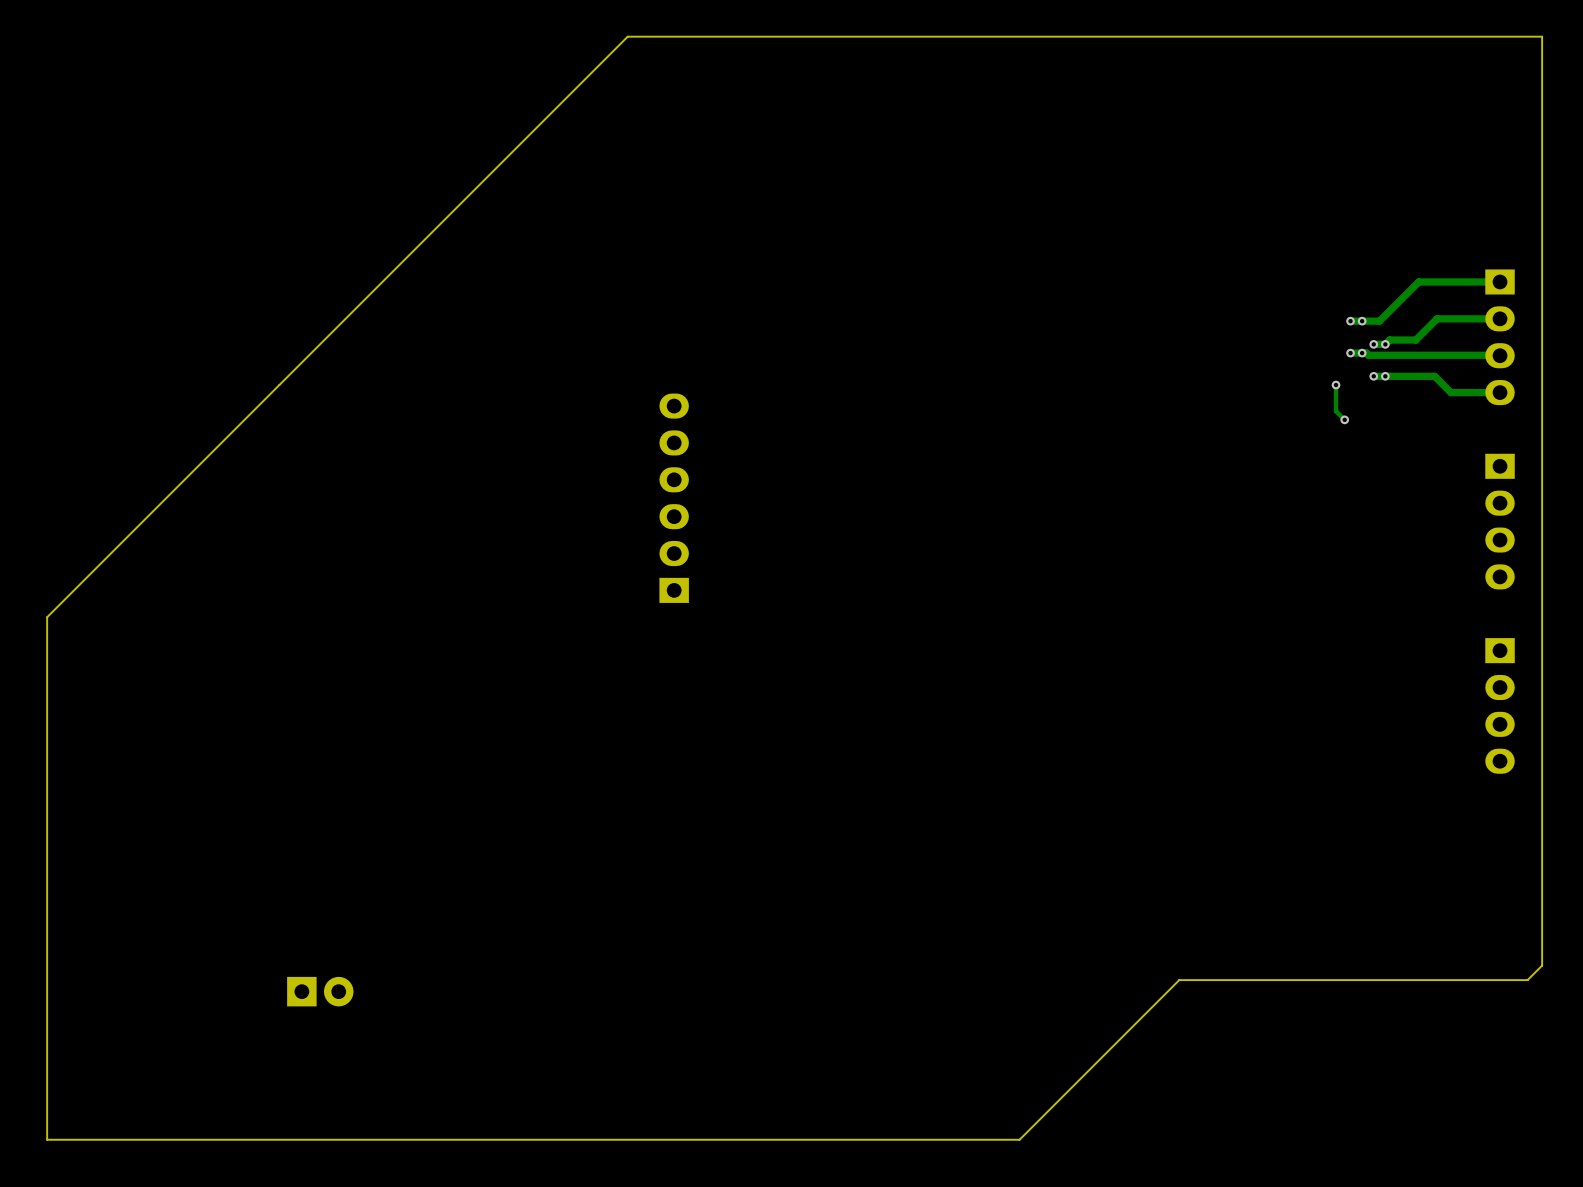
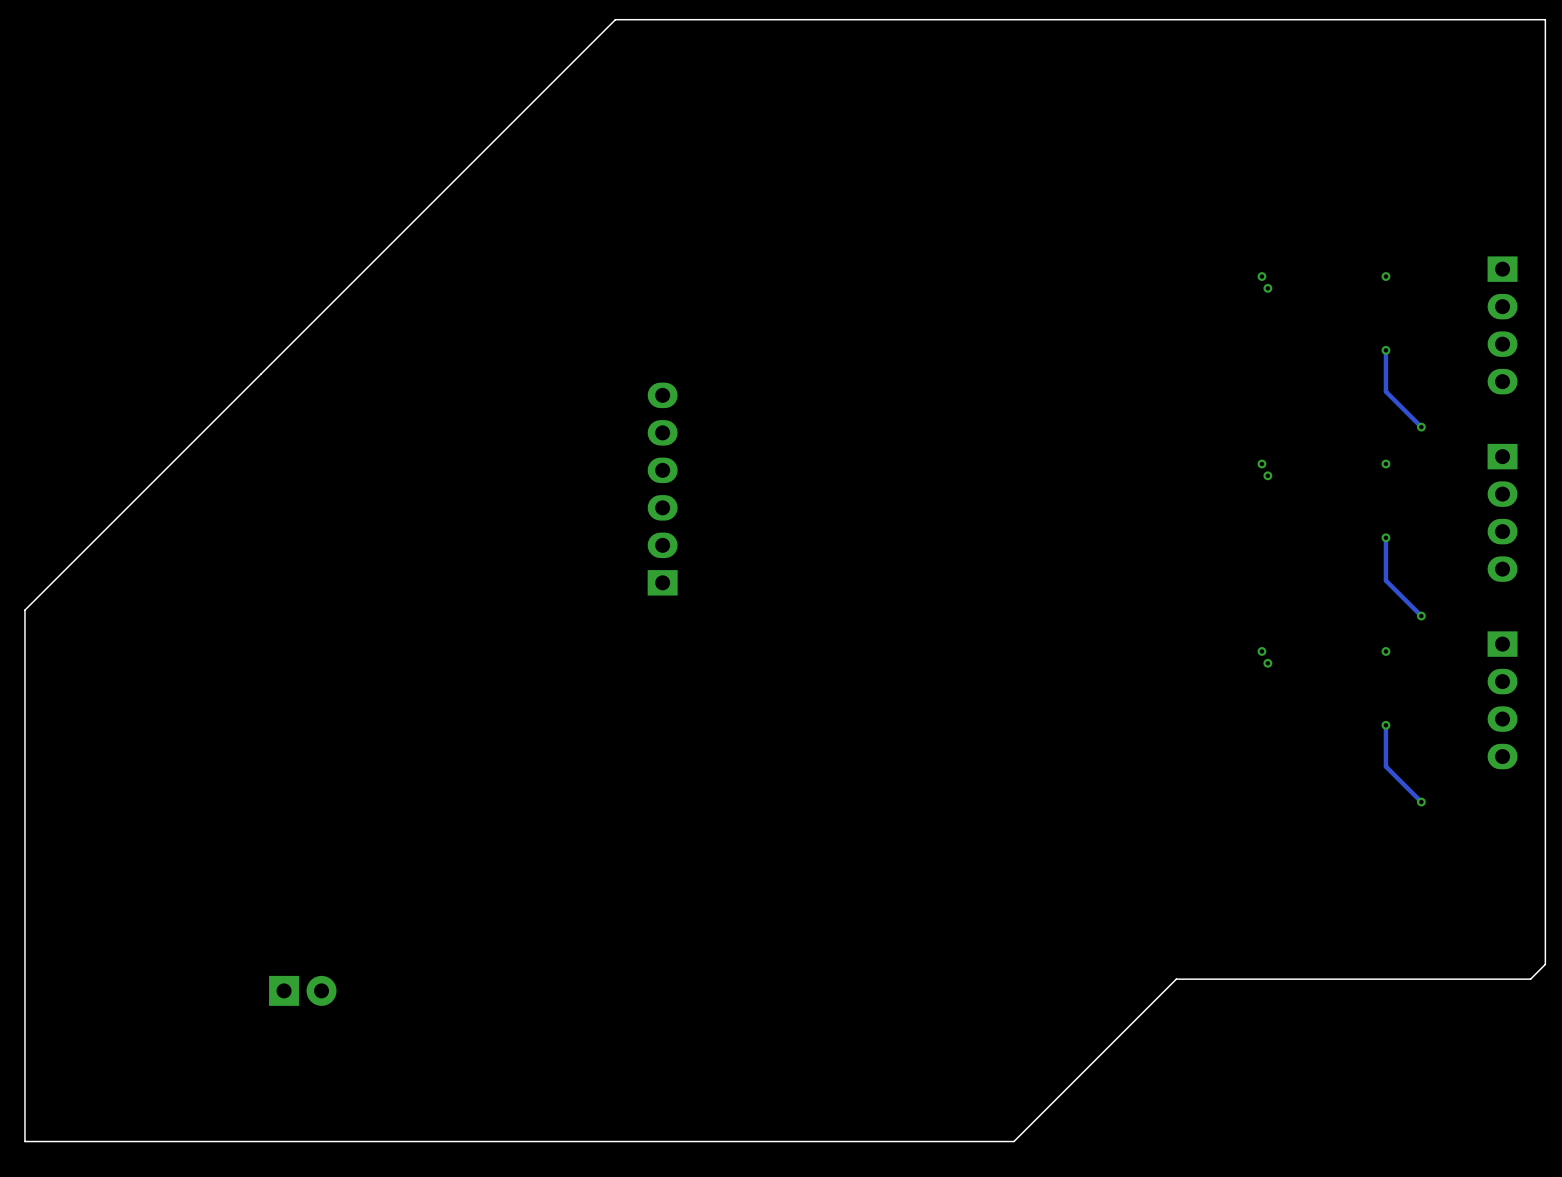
track: (1500, 281) (1418, 281) (1379, 321) (1350, 321) -> none
via: none -> (1261, 276)
via: none -> (1385, 276)
via: none -> (1267, 288)
track: (1500, 318) (1437, 318) (1415, 340) (1389, 340) (1385, 344) (1373, 344) -> none
via: (1350, 321) -> none
via: (1362, 321) -> none
via: (1373, 344) -> none
via: (1385, 344) -> none
track: (1350, 353) (1366, 353) (1368, 355) (1499, 355) -> none
via: (1350, 353) -> none
via: (1362, 353) -> none
track: none -> (1385, 350) (1385, 391) (1421, 427)
via: none -> (1385, 350)
track: (1373, 376) (1434, 376) (1450, 392) (1500, 392) -> none
via: (1373, 376) -> none
via: (1385, 376) -> none
track: (1336, 385) (1336, 411) (1344, 419) -> none
via: (1336, 385) -> none
via: (1344, 419) -> none
via: none -> (1421, 427)
via: none -> (1261, 464)
via: none -> (1385, 464)
via: none -> (1267, 475)
track: none -> (1385, 537) (1385, 580) (1421, 616)
via: none -> (1385, 537)
via: none -> (1421, 616)
via: none -> (1261, 651)
via: none -> (1385, 651)
via: none -> (1267, 663)
track: none -> (1385, 725) (1385, 766) (1421, 802)
via: none -> (1385, 725)
via: none -> (1421, 802)

